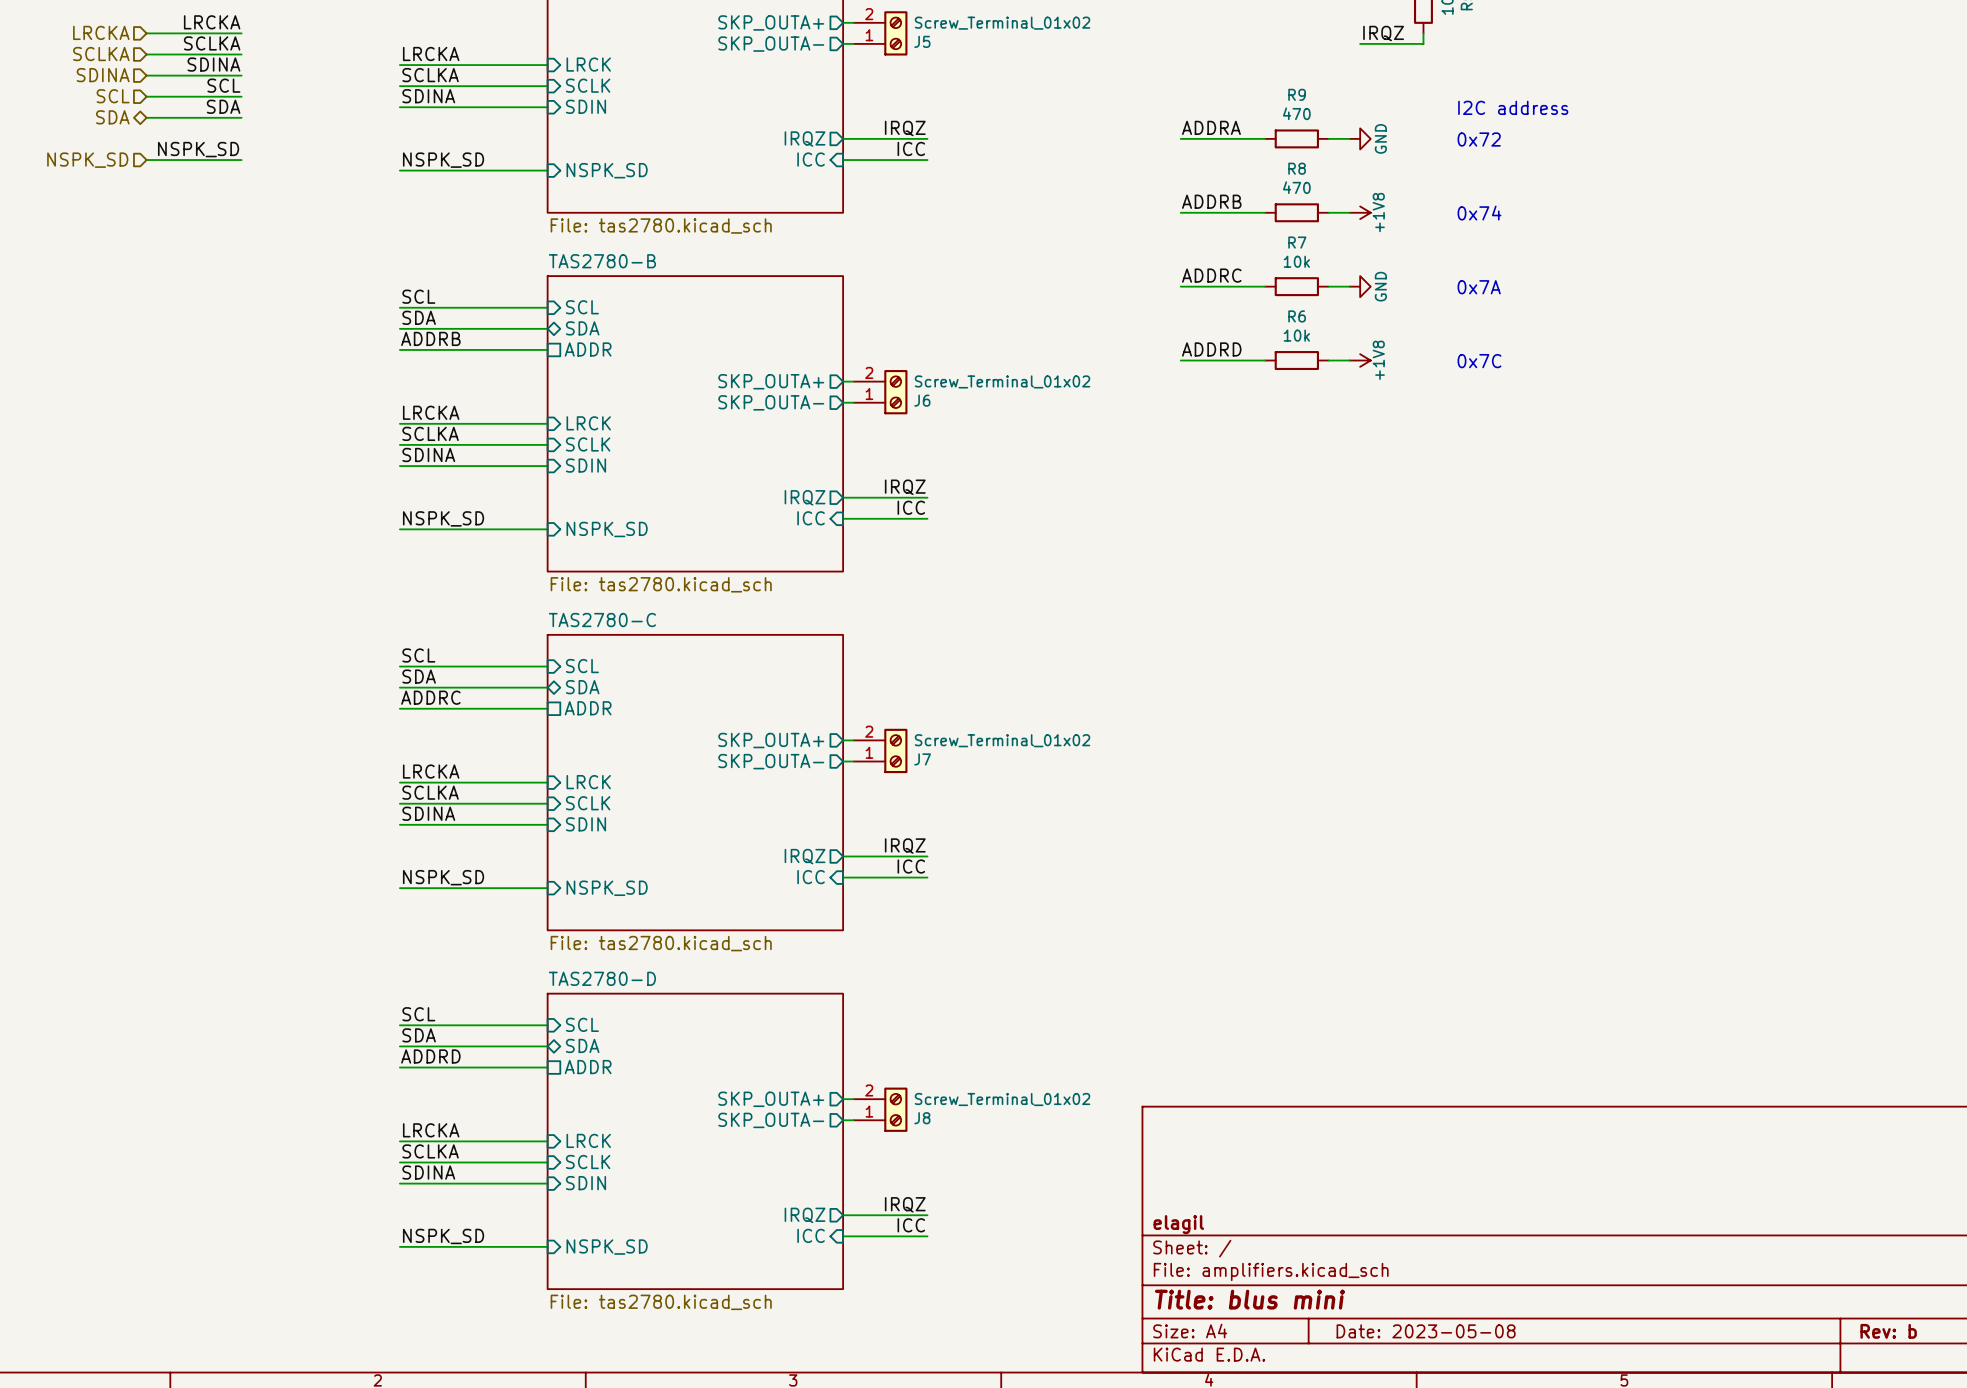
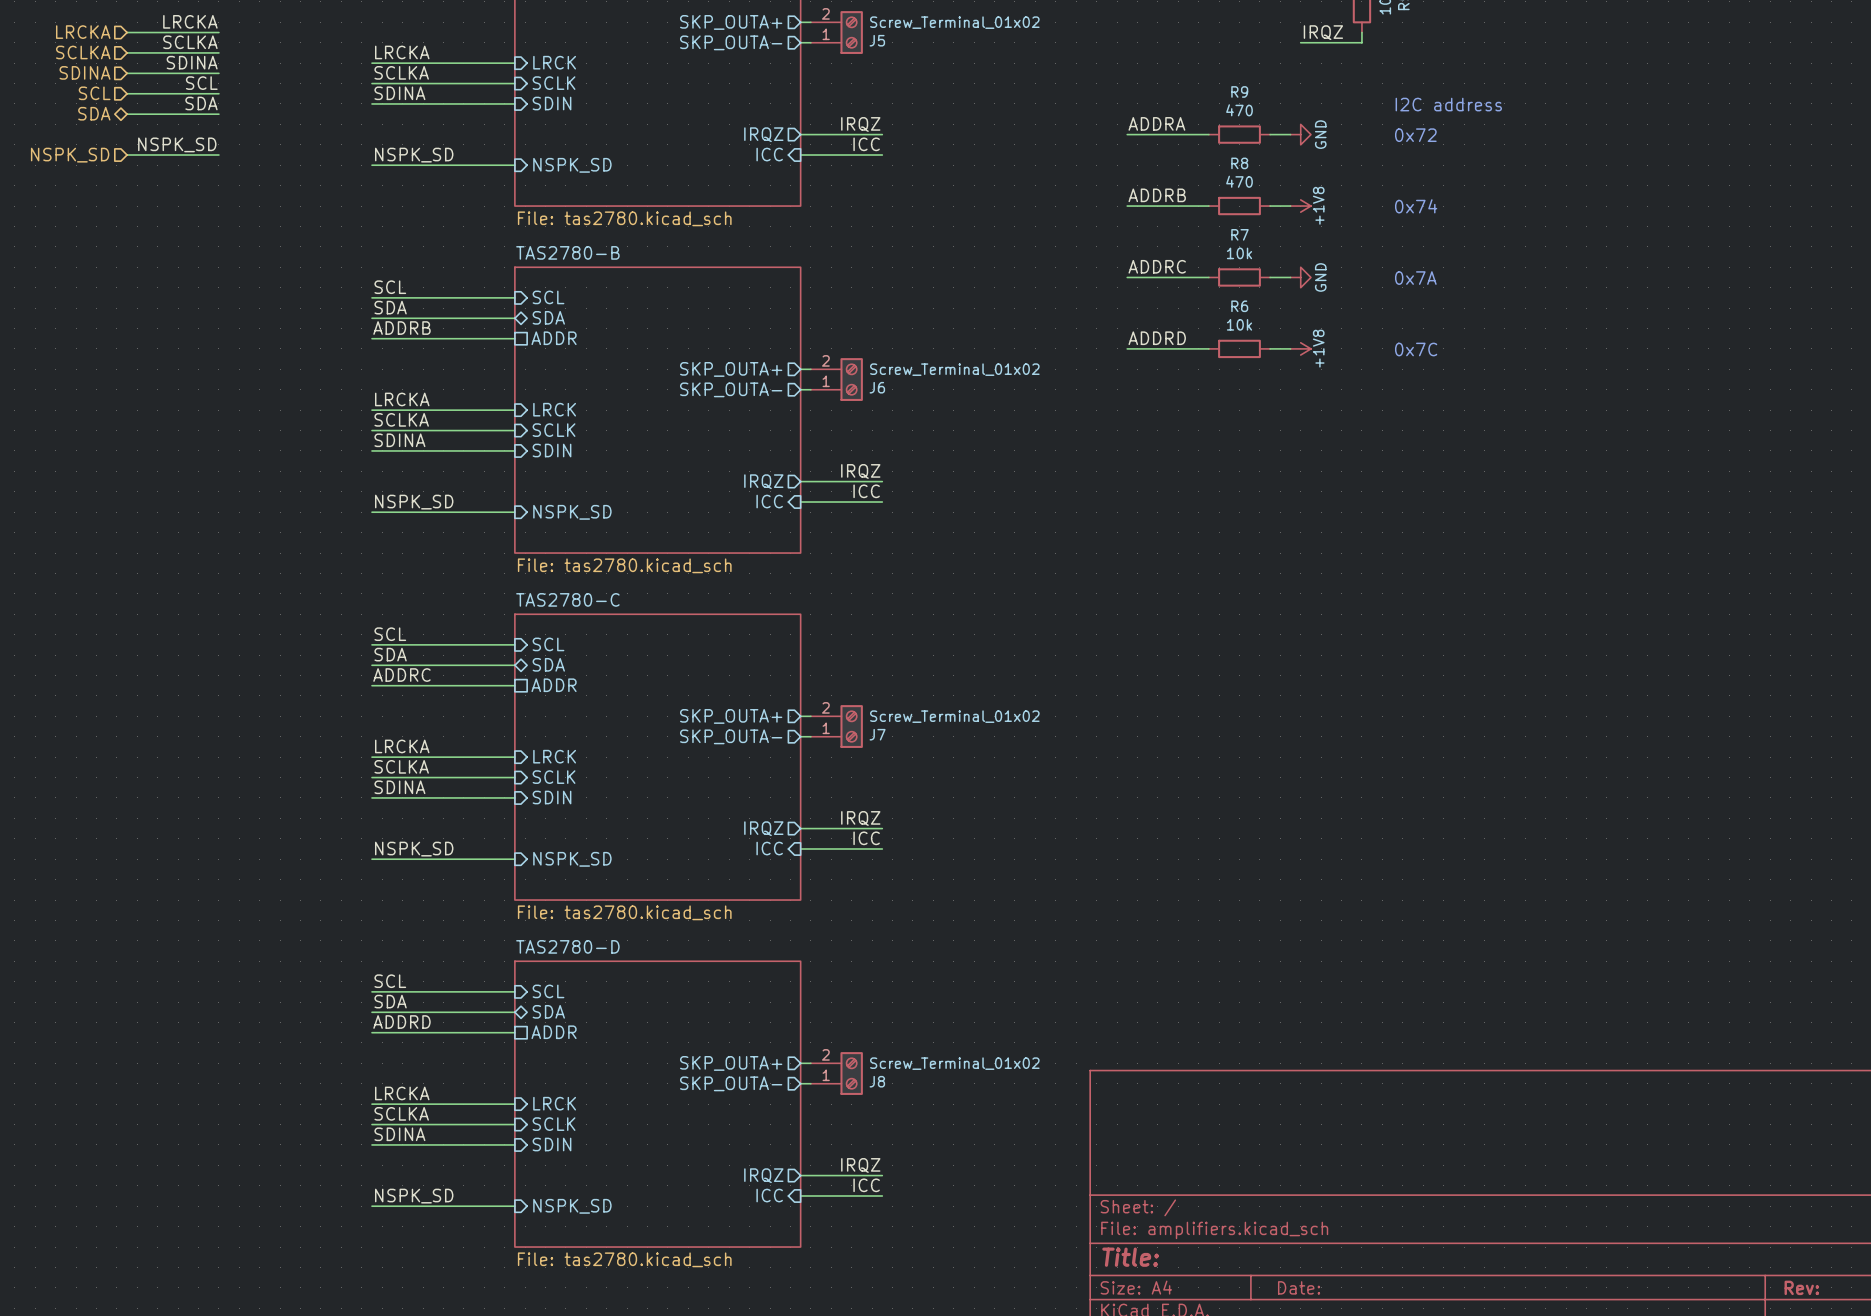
title block: elagil (1178, 1224) -> none
title block: Title: blus mini (1249, 1299) -> Title: (1130, 1257)
title block: Date: 2023-05-08 (1426, 1331) -> Date: (1299, 1287)
title block: Rev: b (1888, 1331) -> Rev: (1801, 1287)

